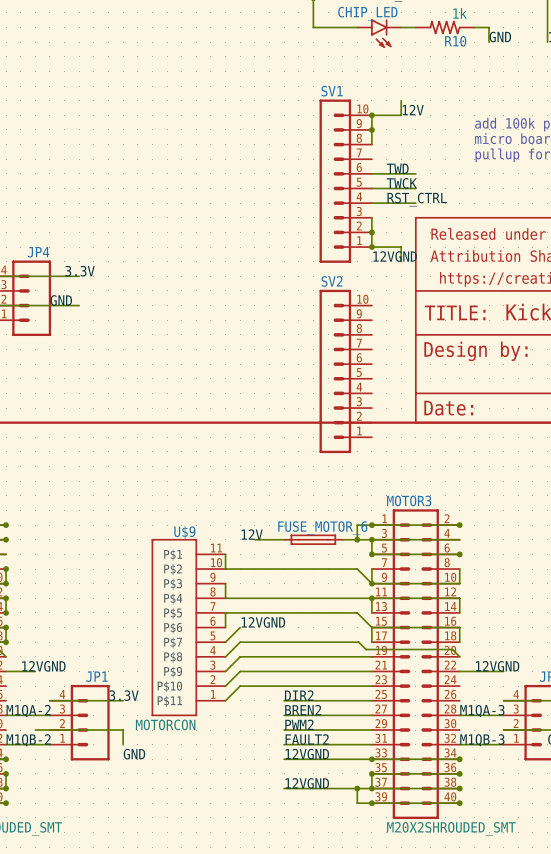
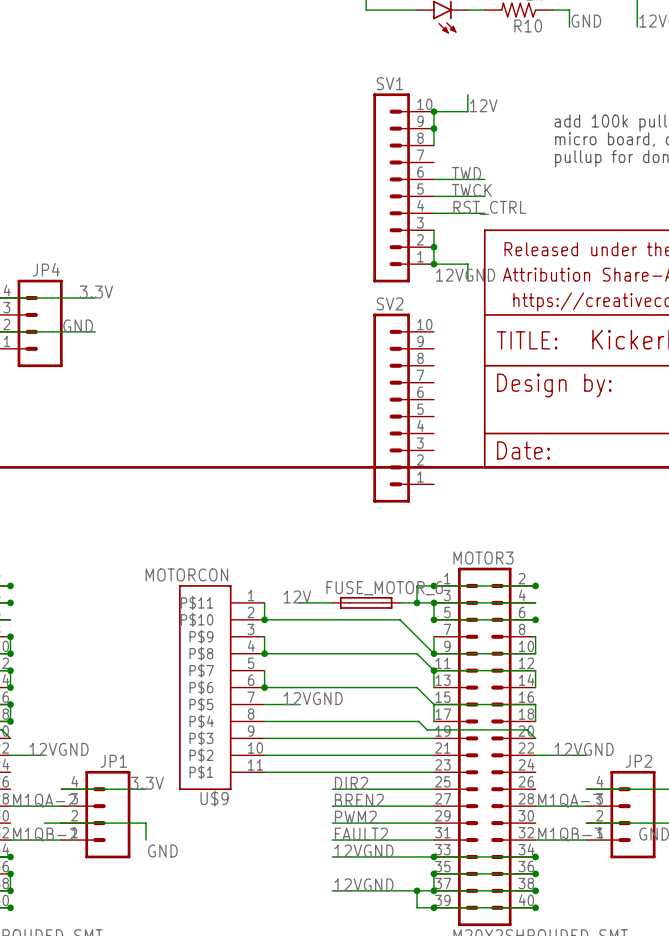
wire: (225, 554) (225, 569) (357, 569) -> (264, 602) (264, 619) (400, 619) (417, 636)
junction: none -> (264, 619)
wire: (225, 583) (225, 598) (371, 598) -> (264, 636) (264, 653) (417, 653) (433, 670)
junction: none -> (264, 653)
wire: (225, 612) (225, 627) -> (264, 687) (264, 670)
junction: none -> (264, 687)
U$9 flip: as is (174, 627) -> up-down (205, 687)
wire: none -> (264, 704) (298, 704)
wire: (240, 627) (225, 642) -> (281, 721) (264, 721)
wire: (240, 642) (225, 656) -> (281, 738) (264, 738)
wire: (240, 656) (225, 671) -> (281, 755) (264, 755)
wire: (240, 671) (225, 686) -> none
wire: (240, 686) (225, 700) -> (281, 772) (264, 772)

